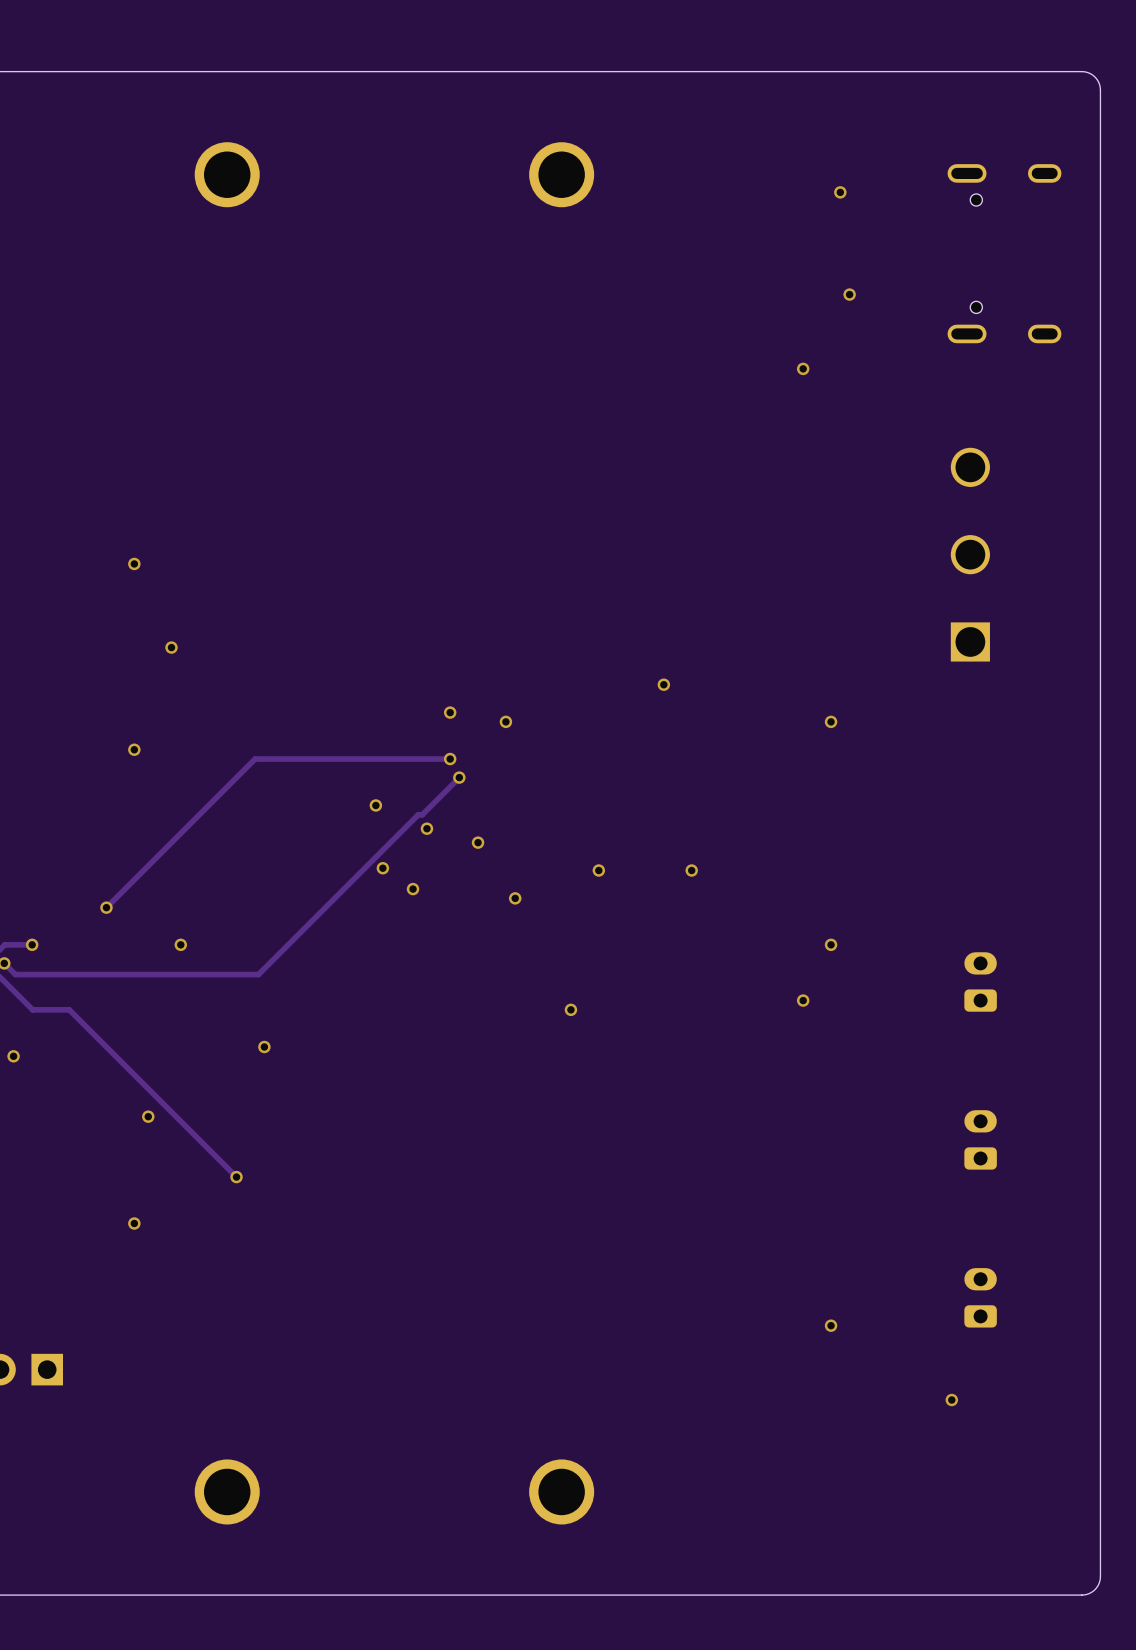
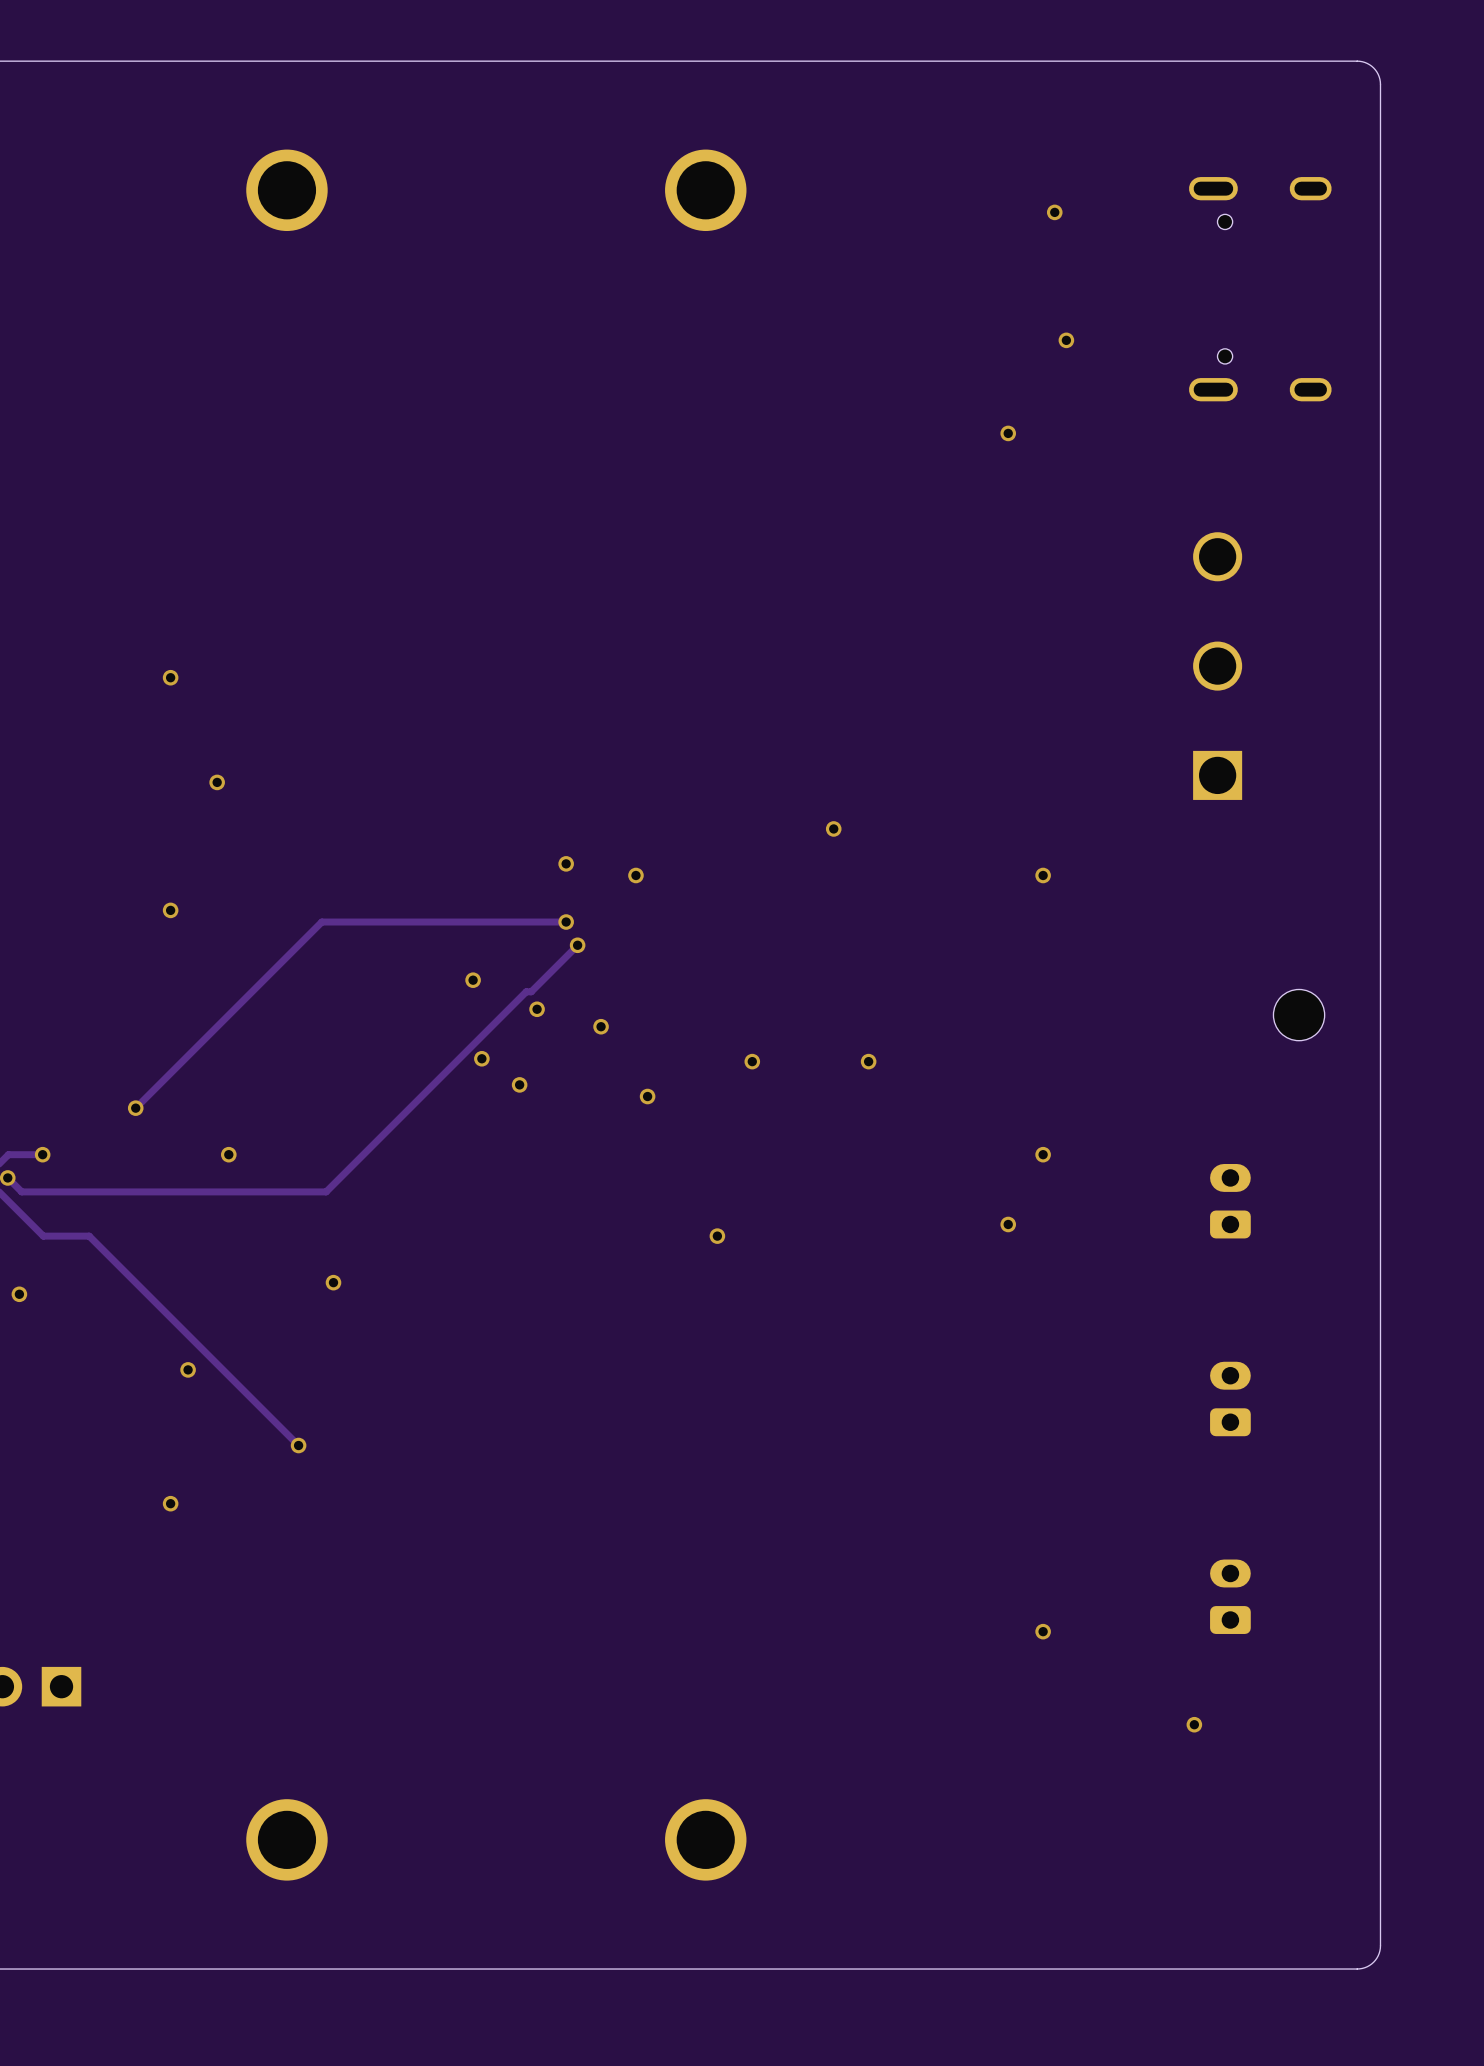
part: none -> (1299, 1015)

